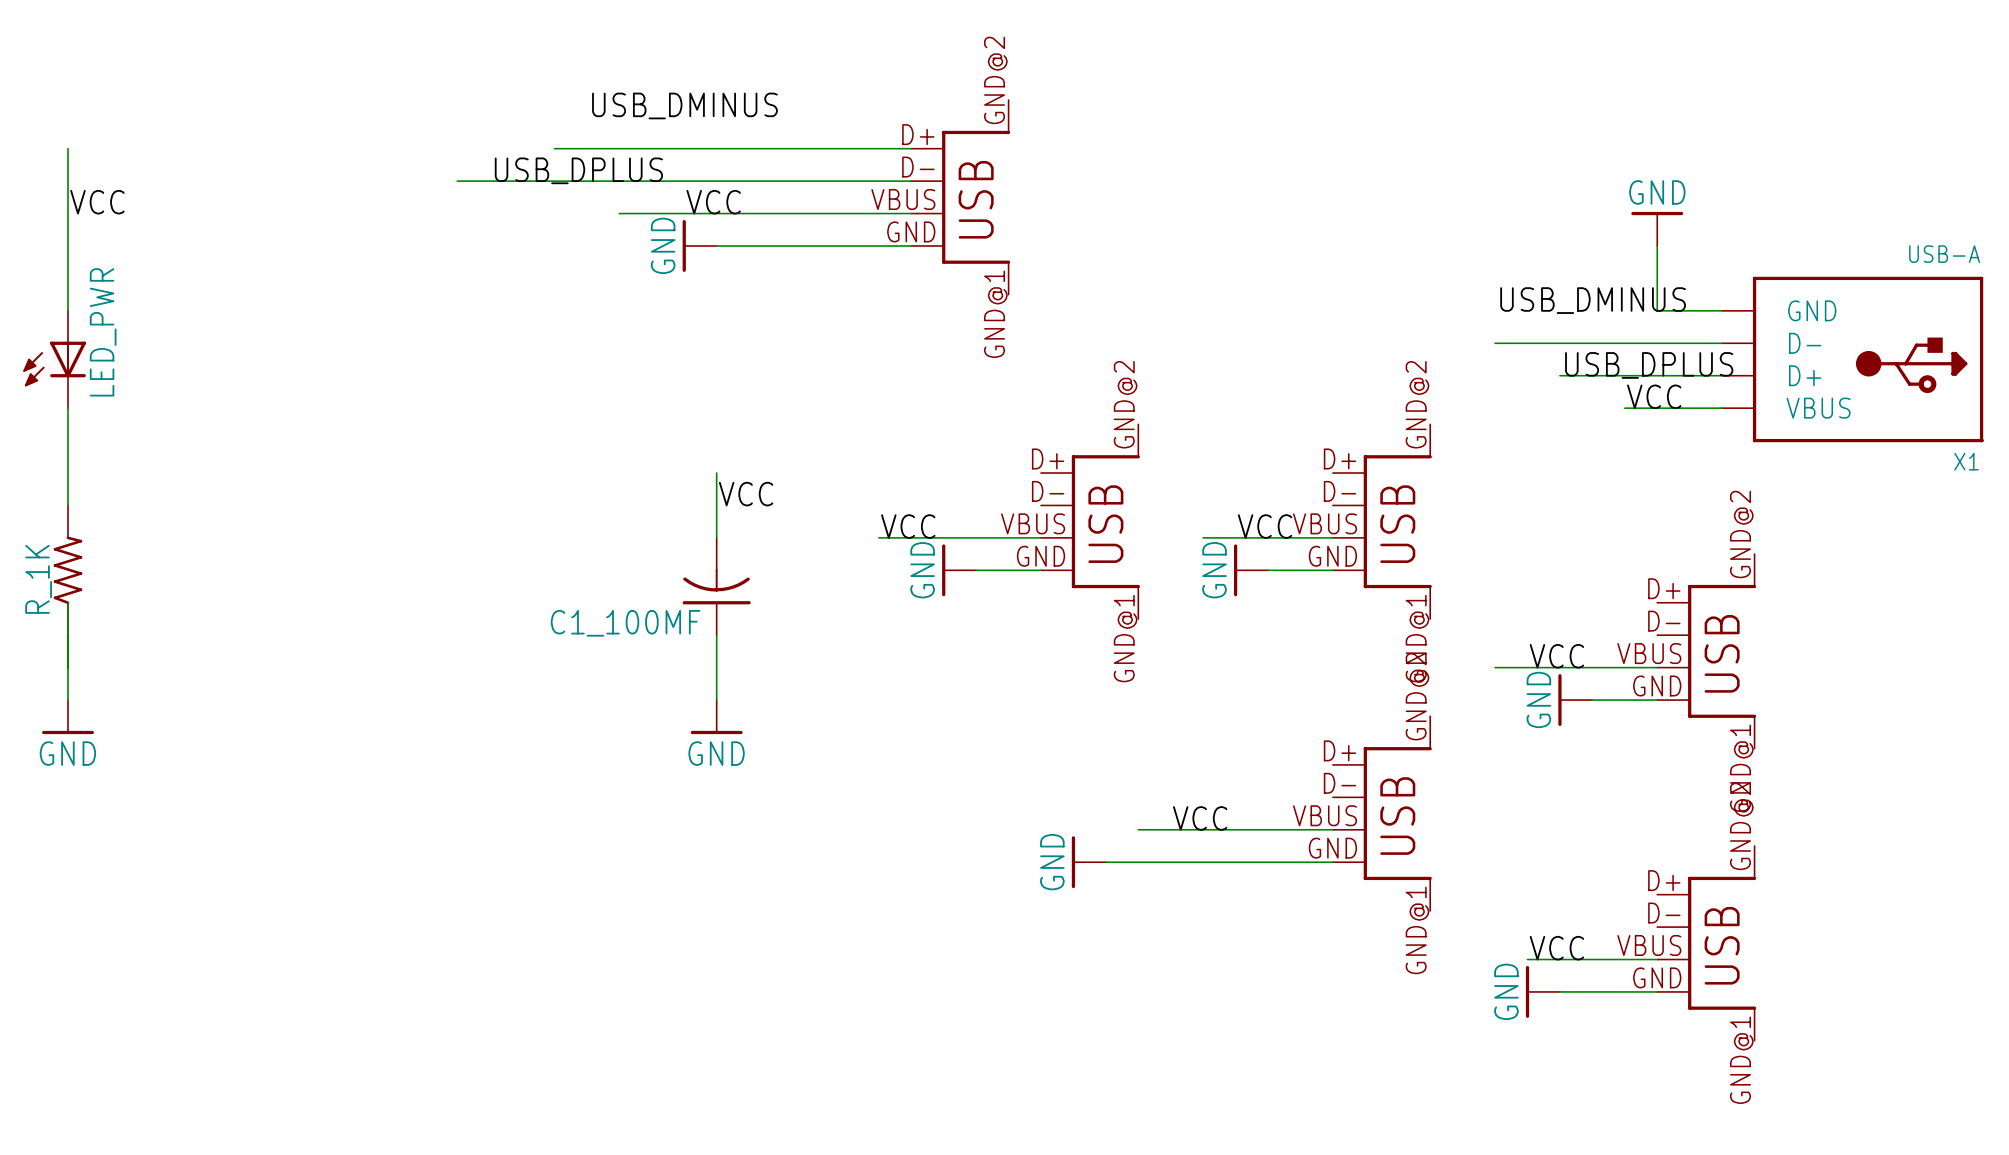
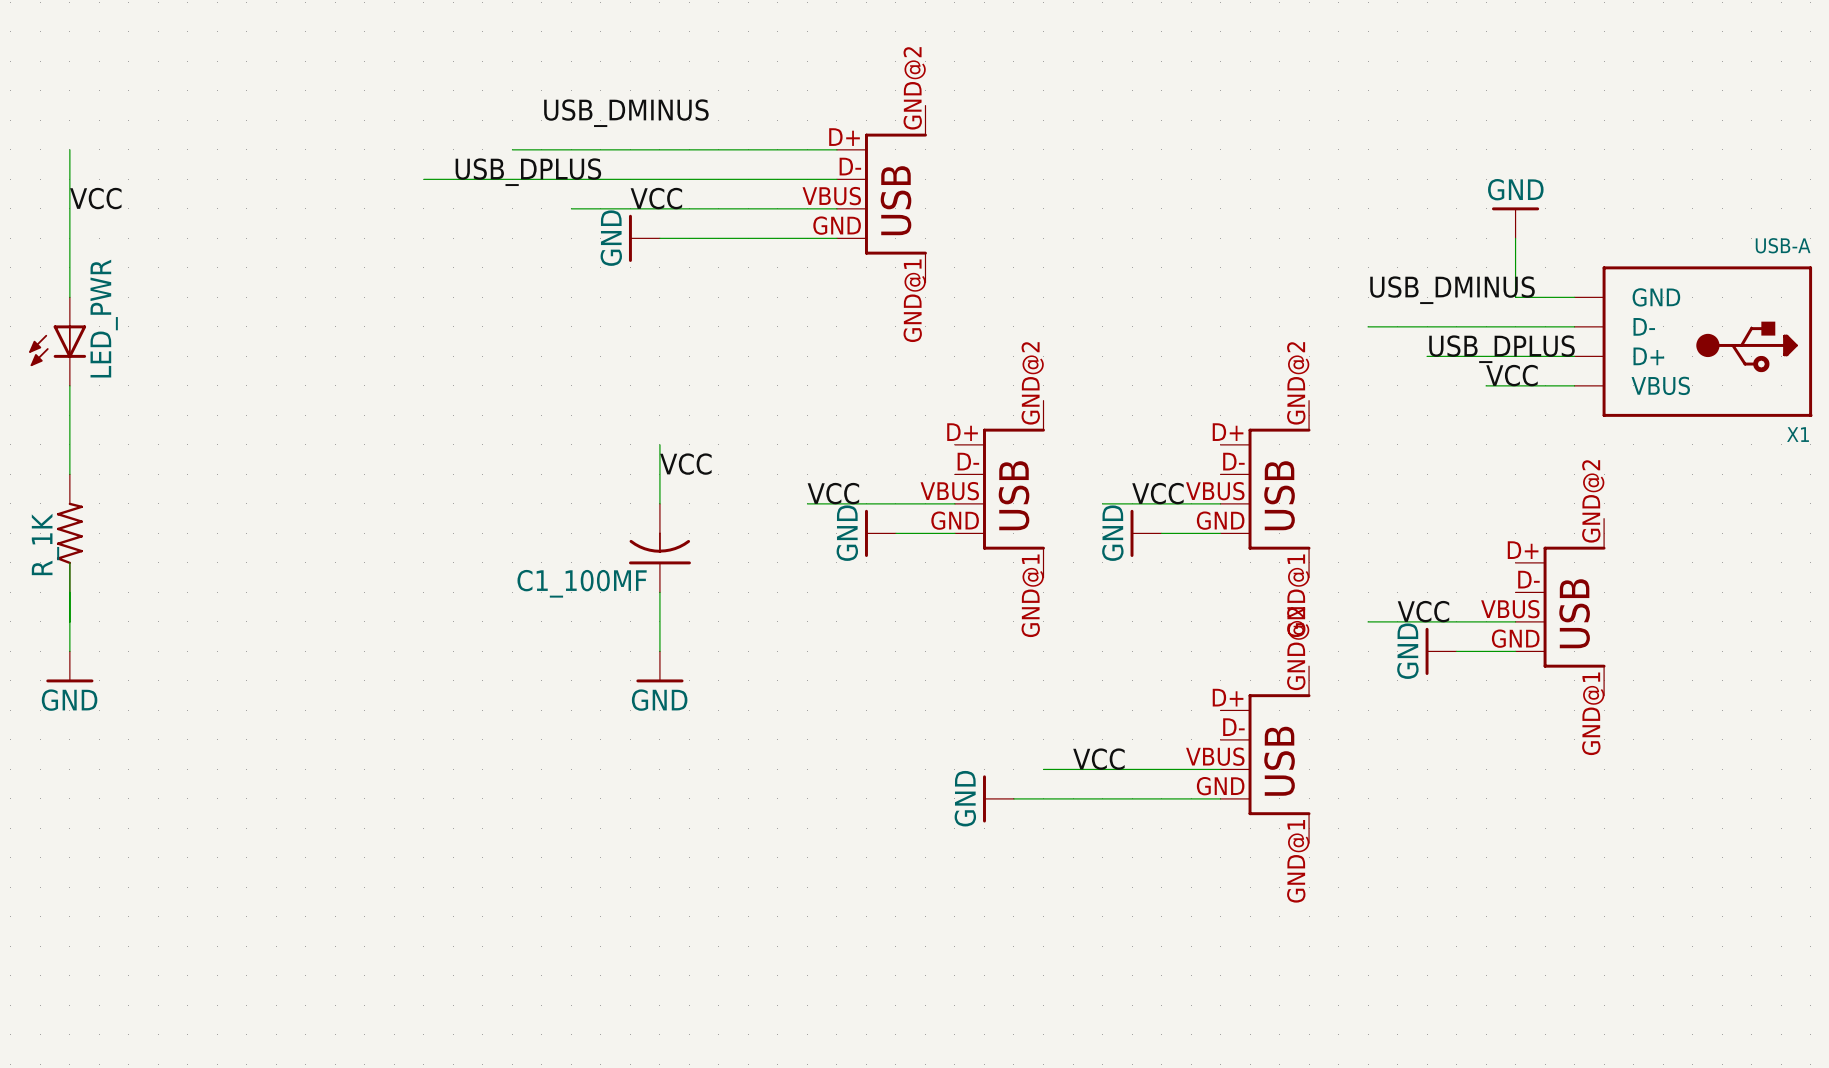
part: (1706, 943) -> none
label: VCC (1556, 948) -> none
wire: (1527, 959) (1657, 959) -> none
power symbol: GND (1542, 991) -> none
wire: (1559, 991) (1657, 991) -> none

